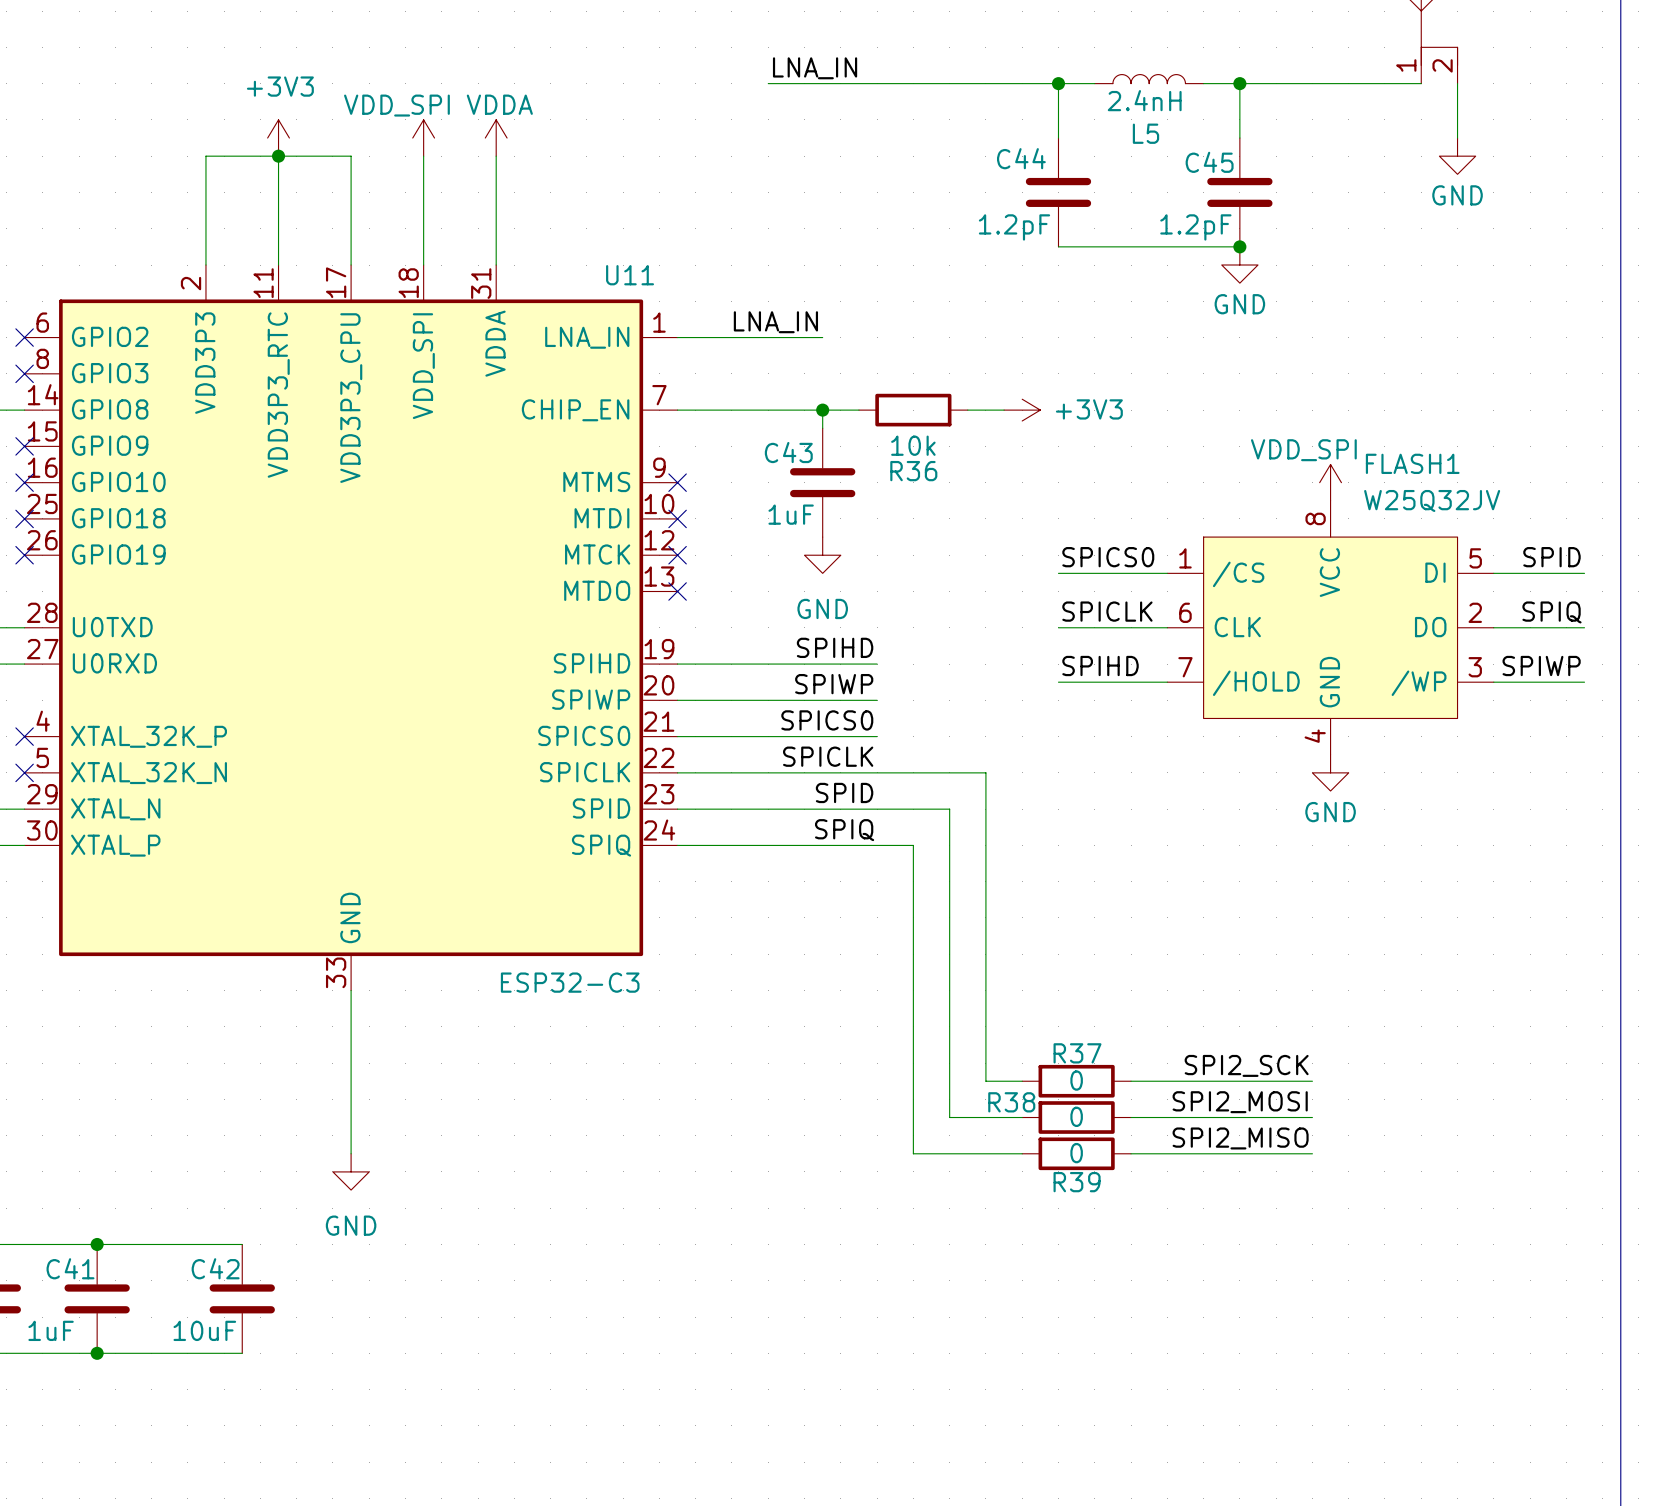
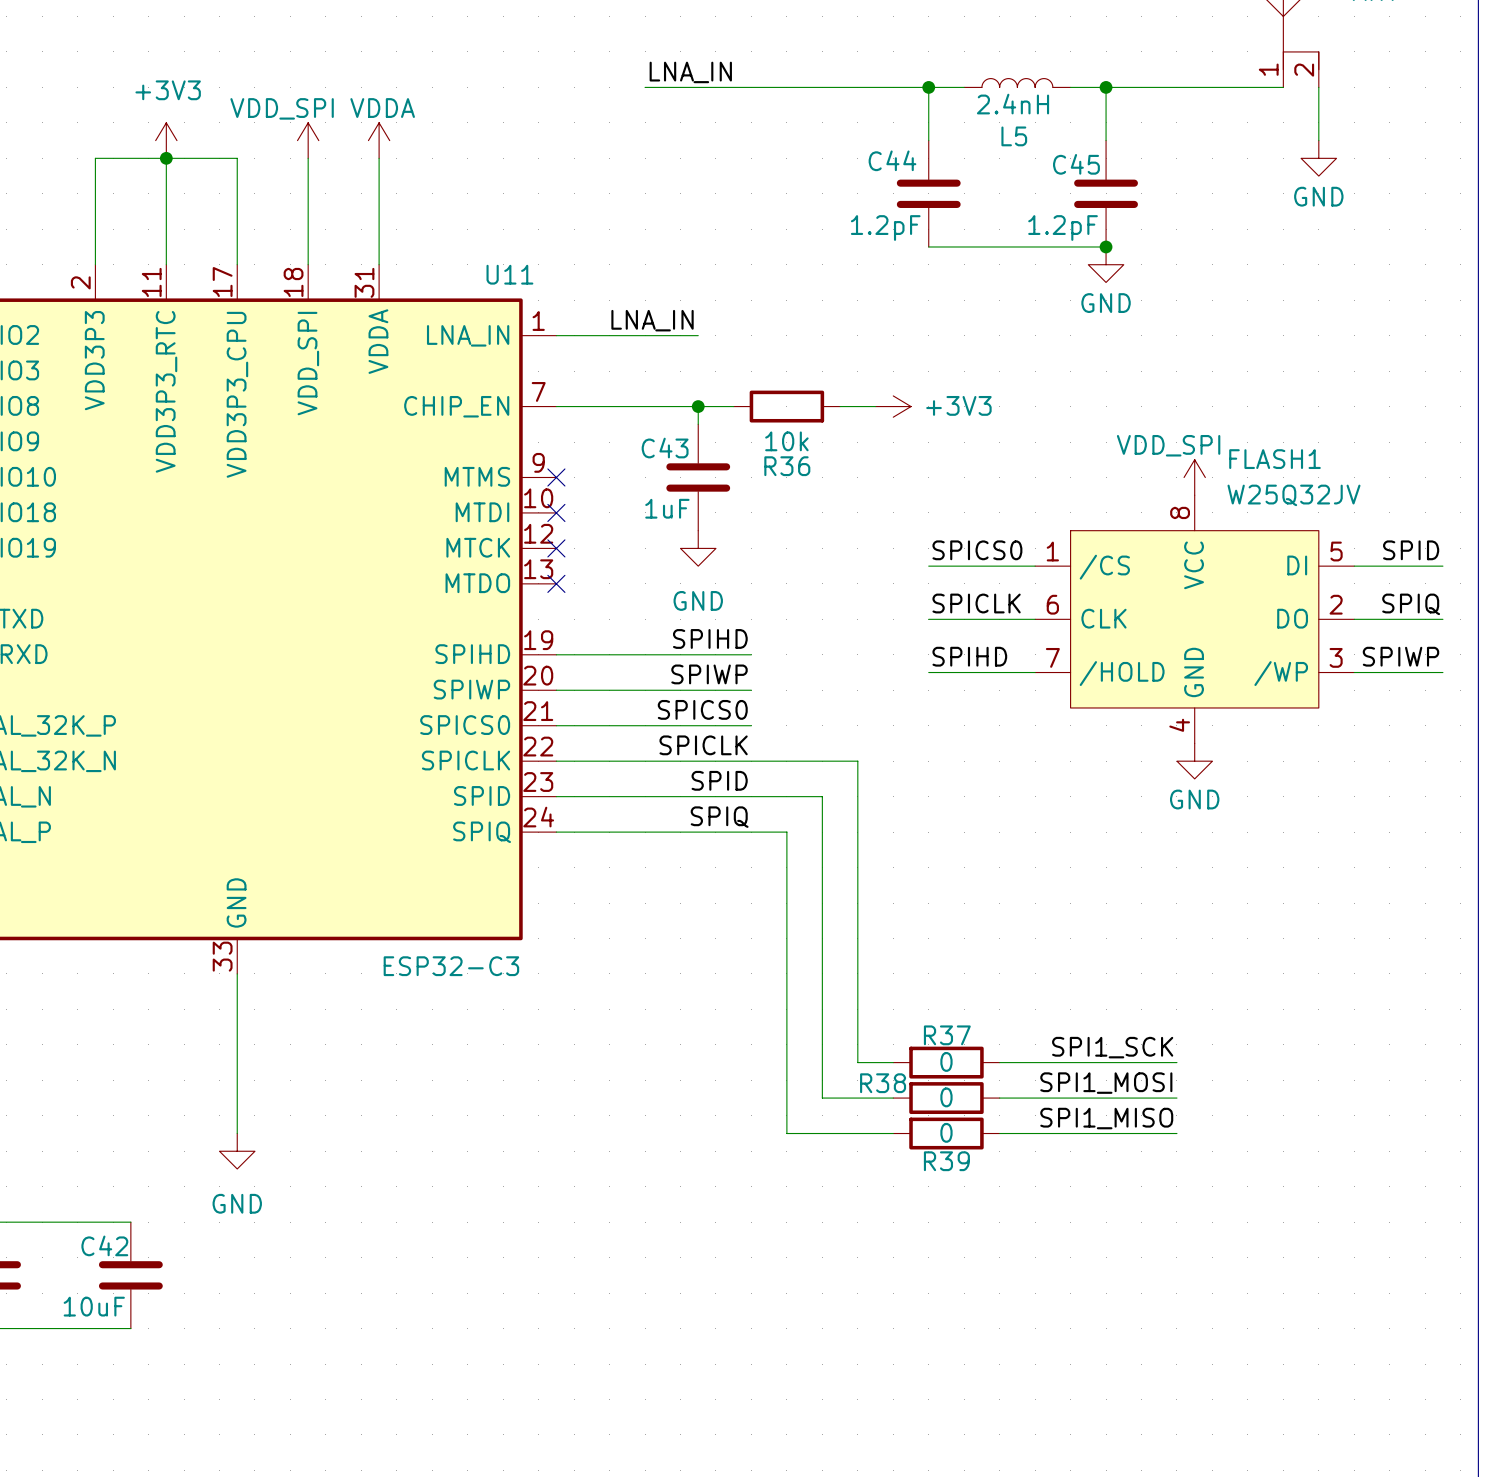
label: SPI2_SCK (1246, 1065) -> SPI1_SCK (1112, 1047)
label: SPI2_MOSI (1240, 1102) -> SPI1_MOSI (1106, 1083)
label: SPI2_MISO (1240, 1138) -> SPI1_MISO (1106, 1118)

